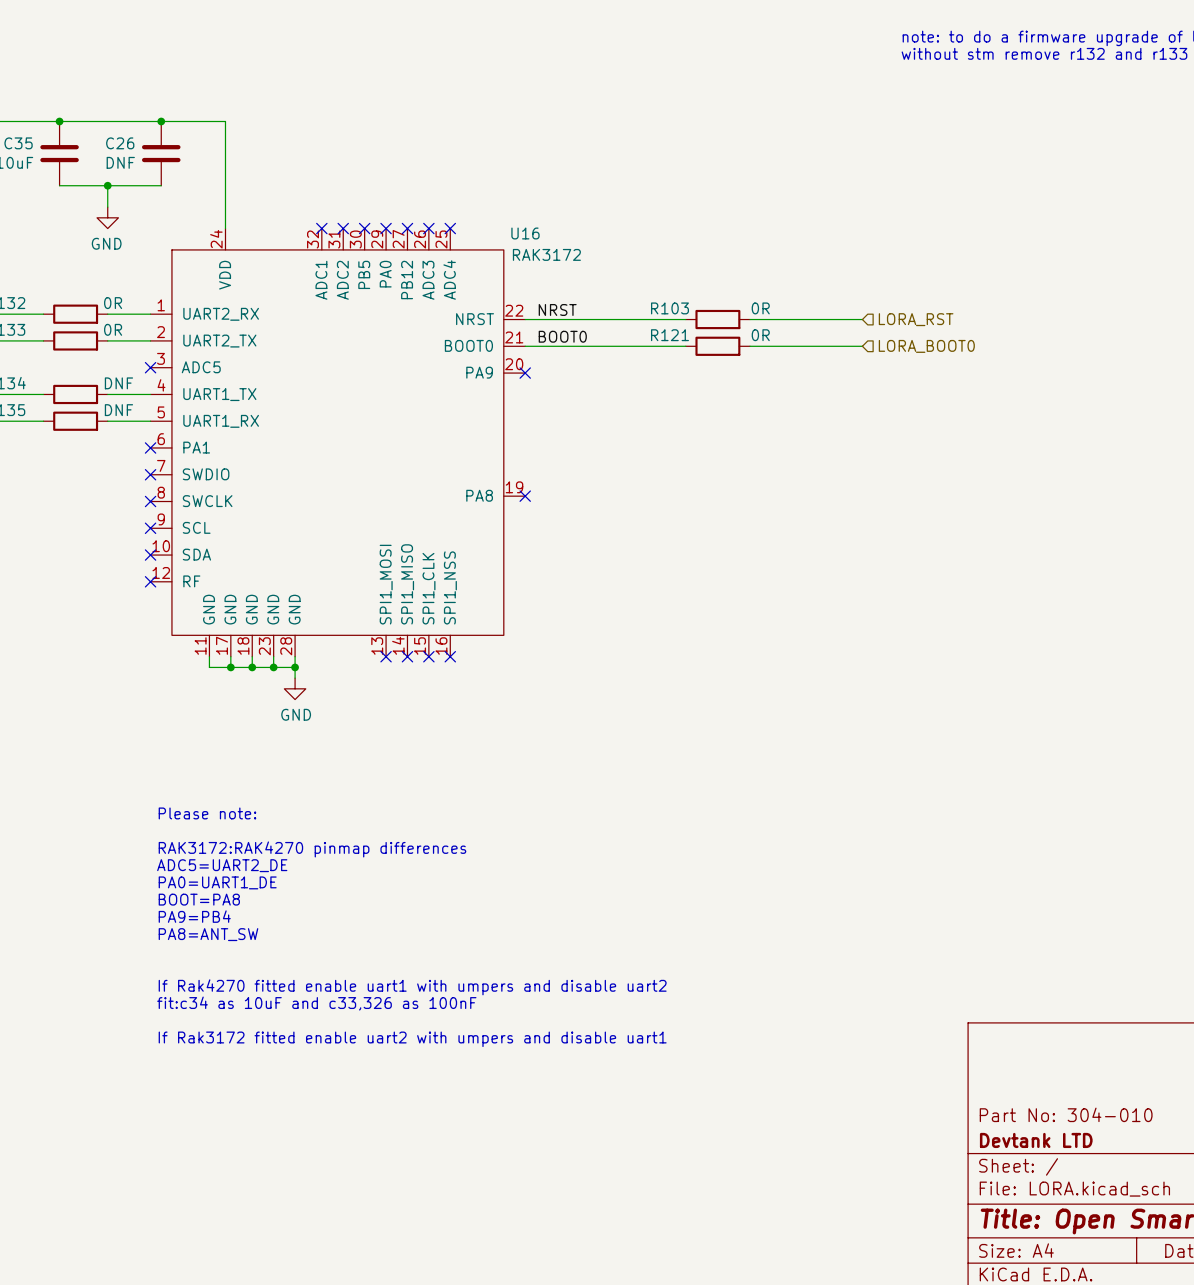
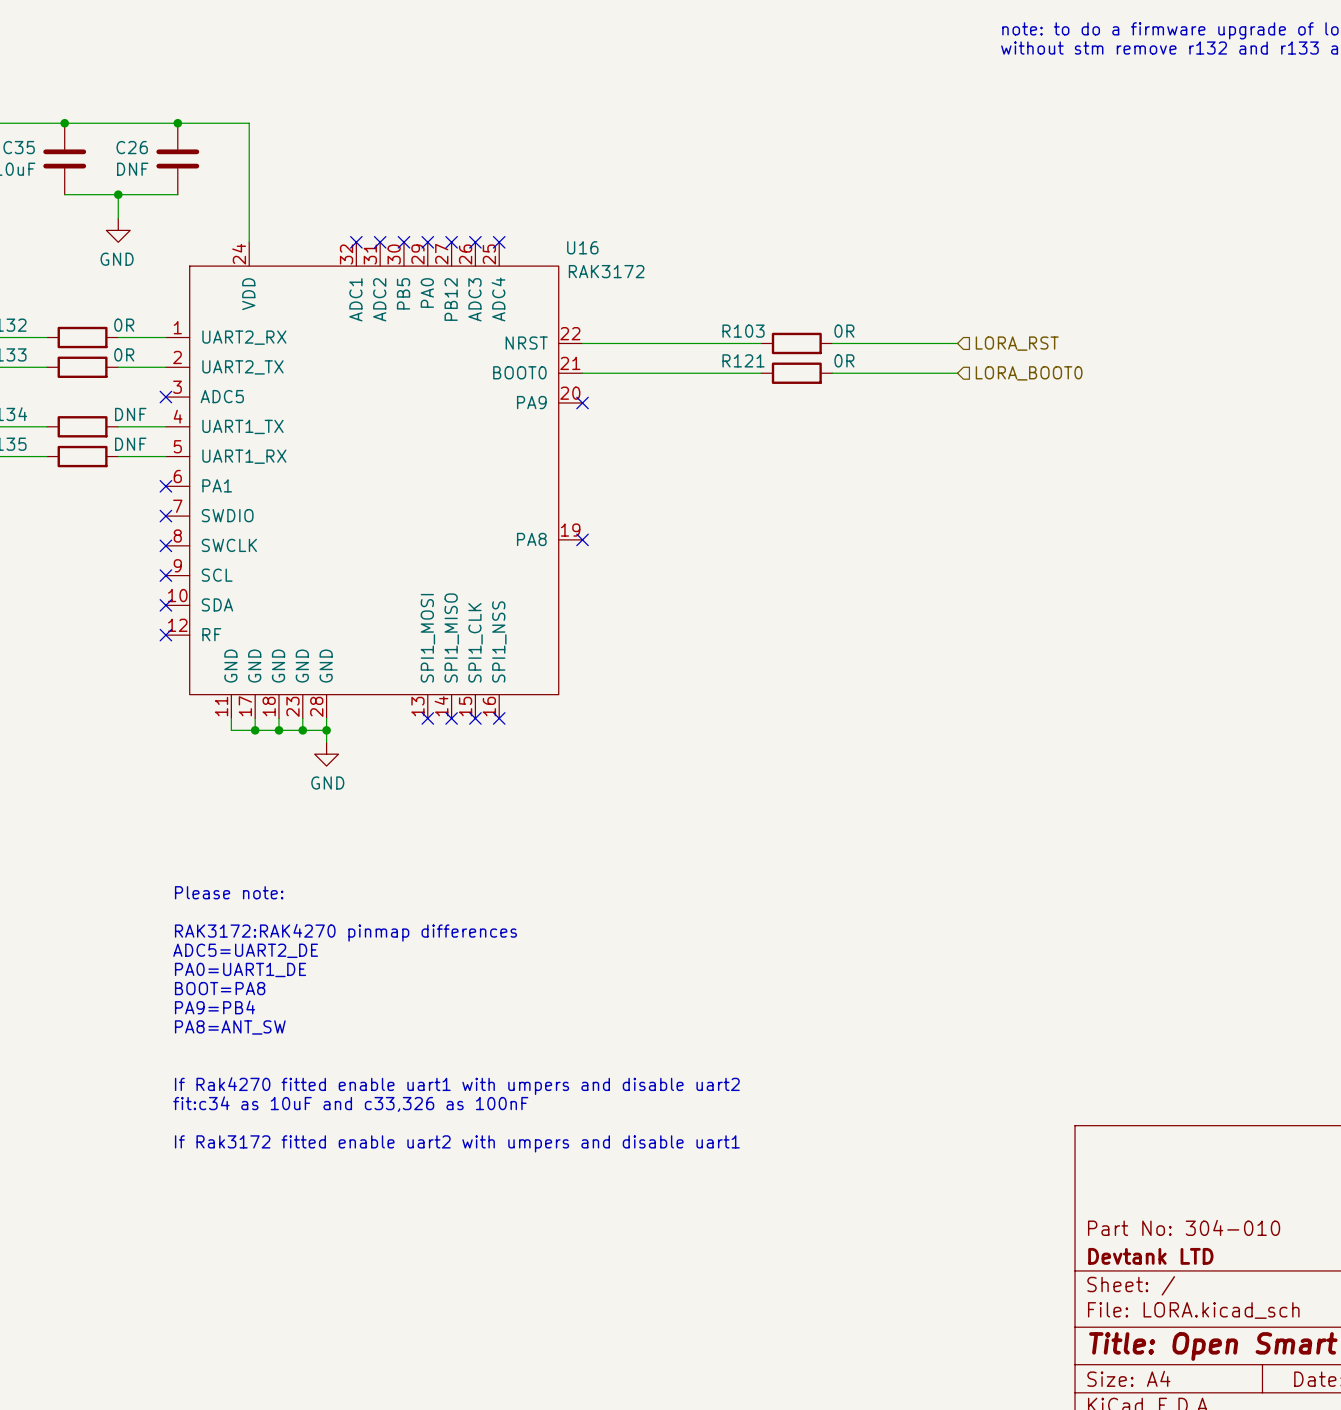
label: NRST (557, 309) -> none
label: BOOT0 (562, 336) -> none

